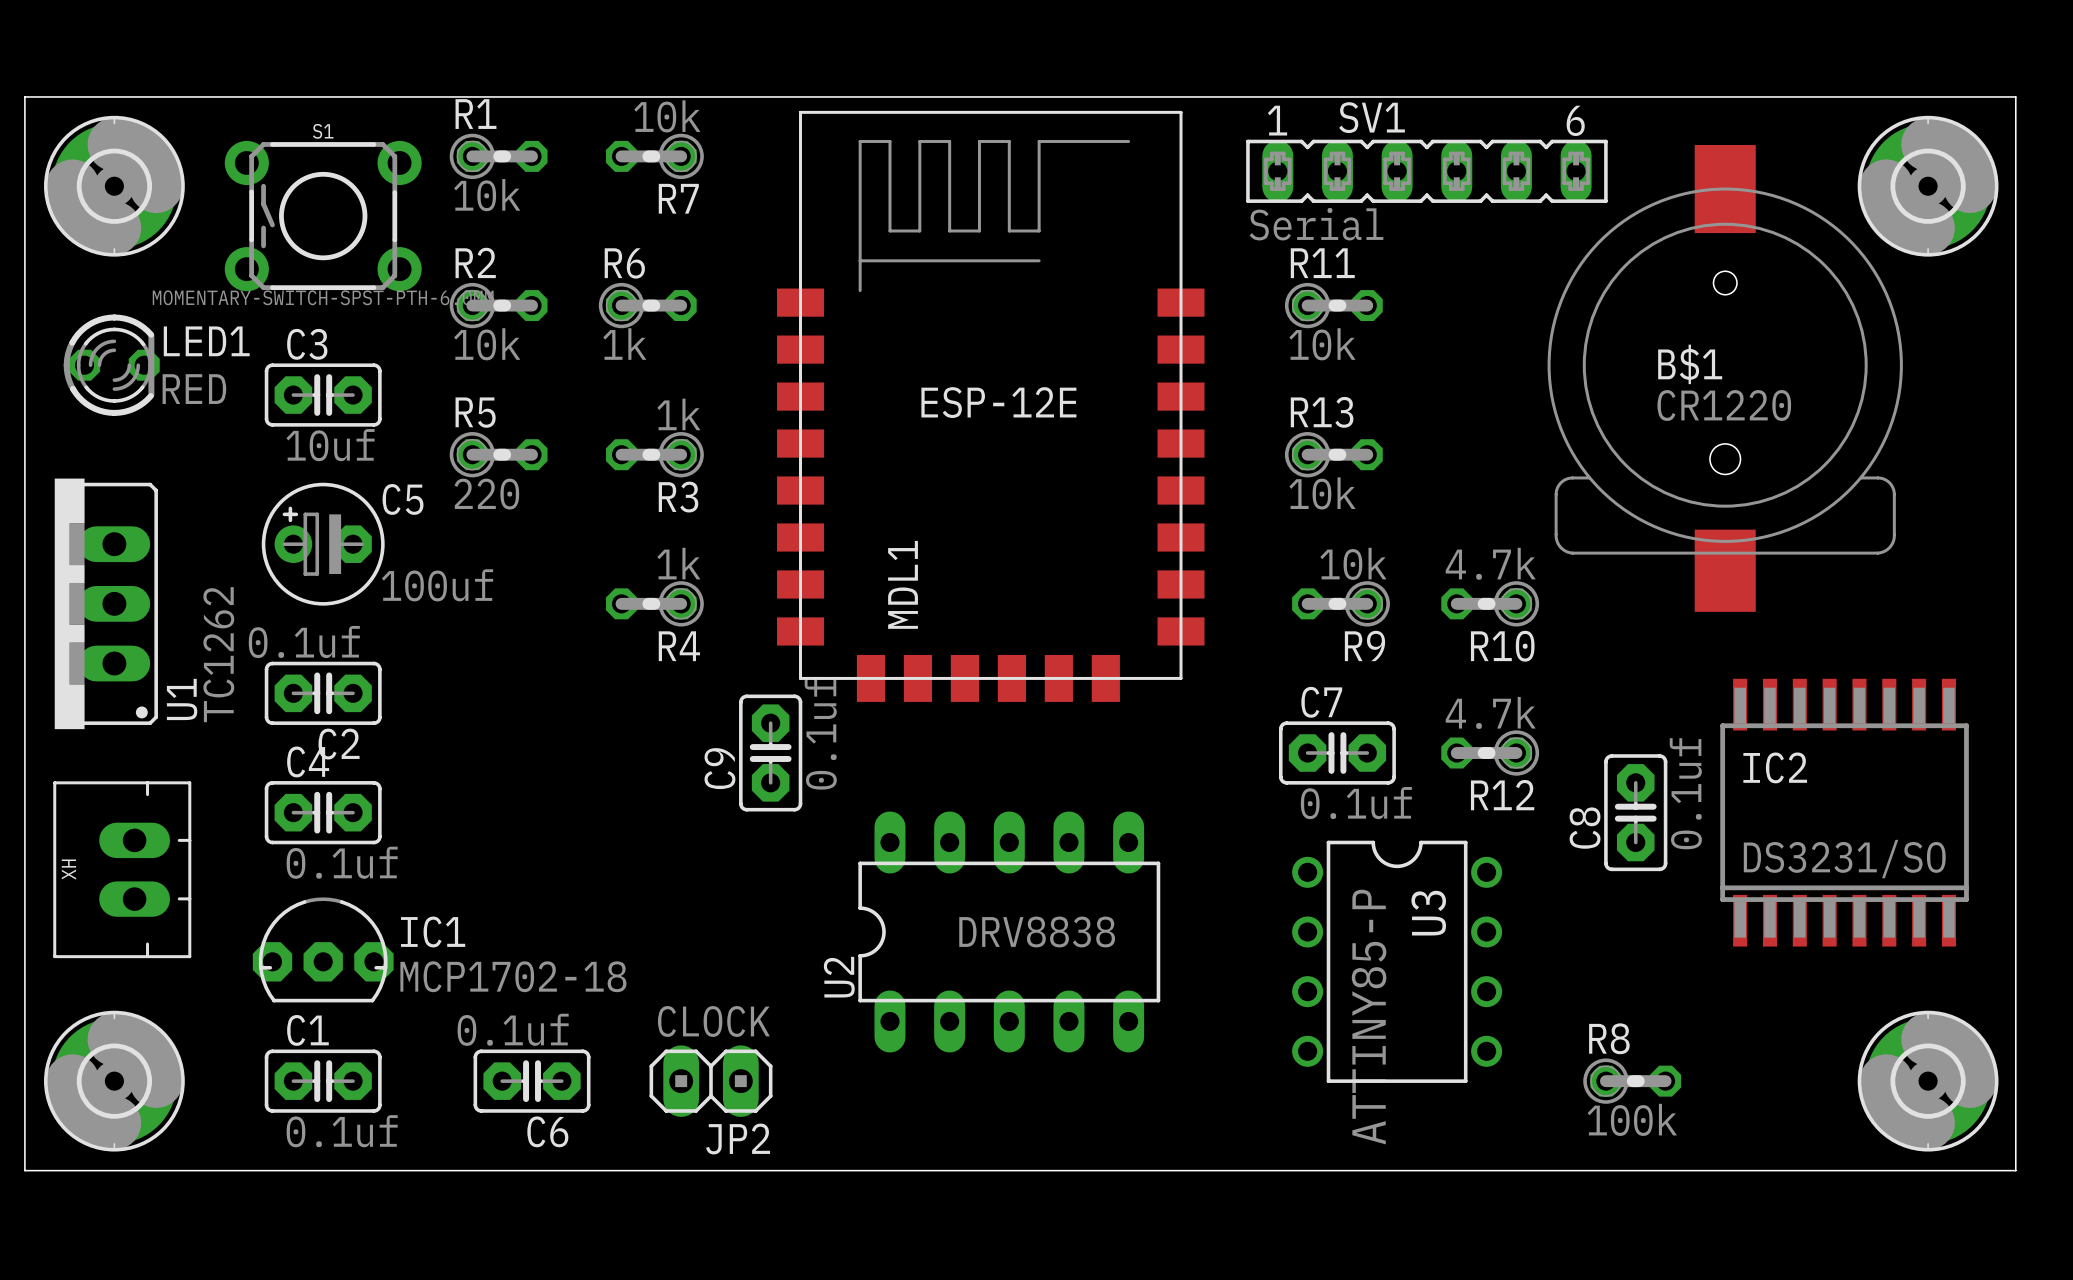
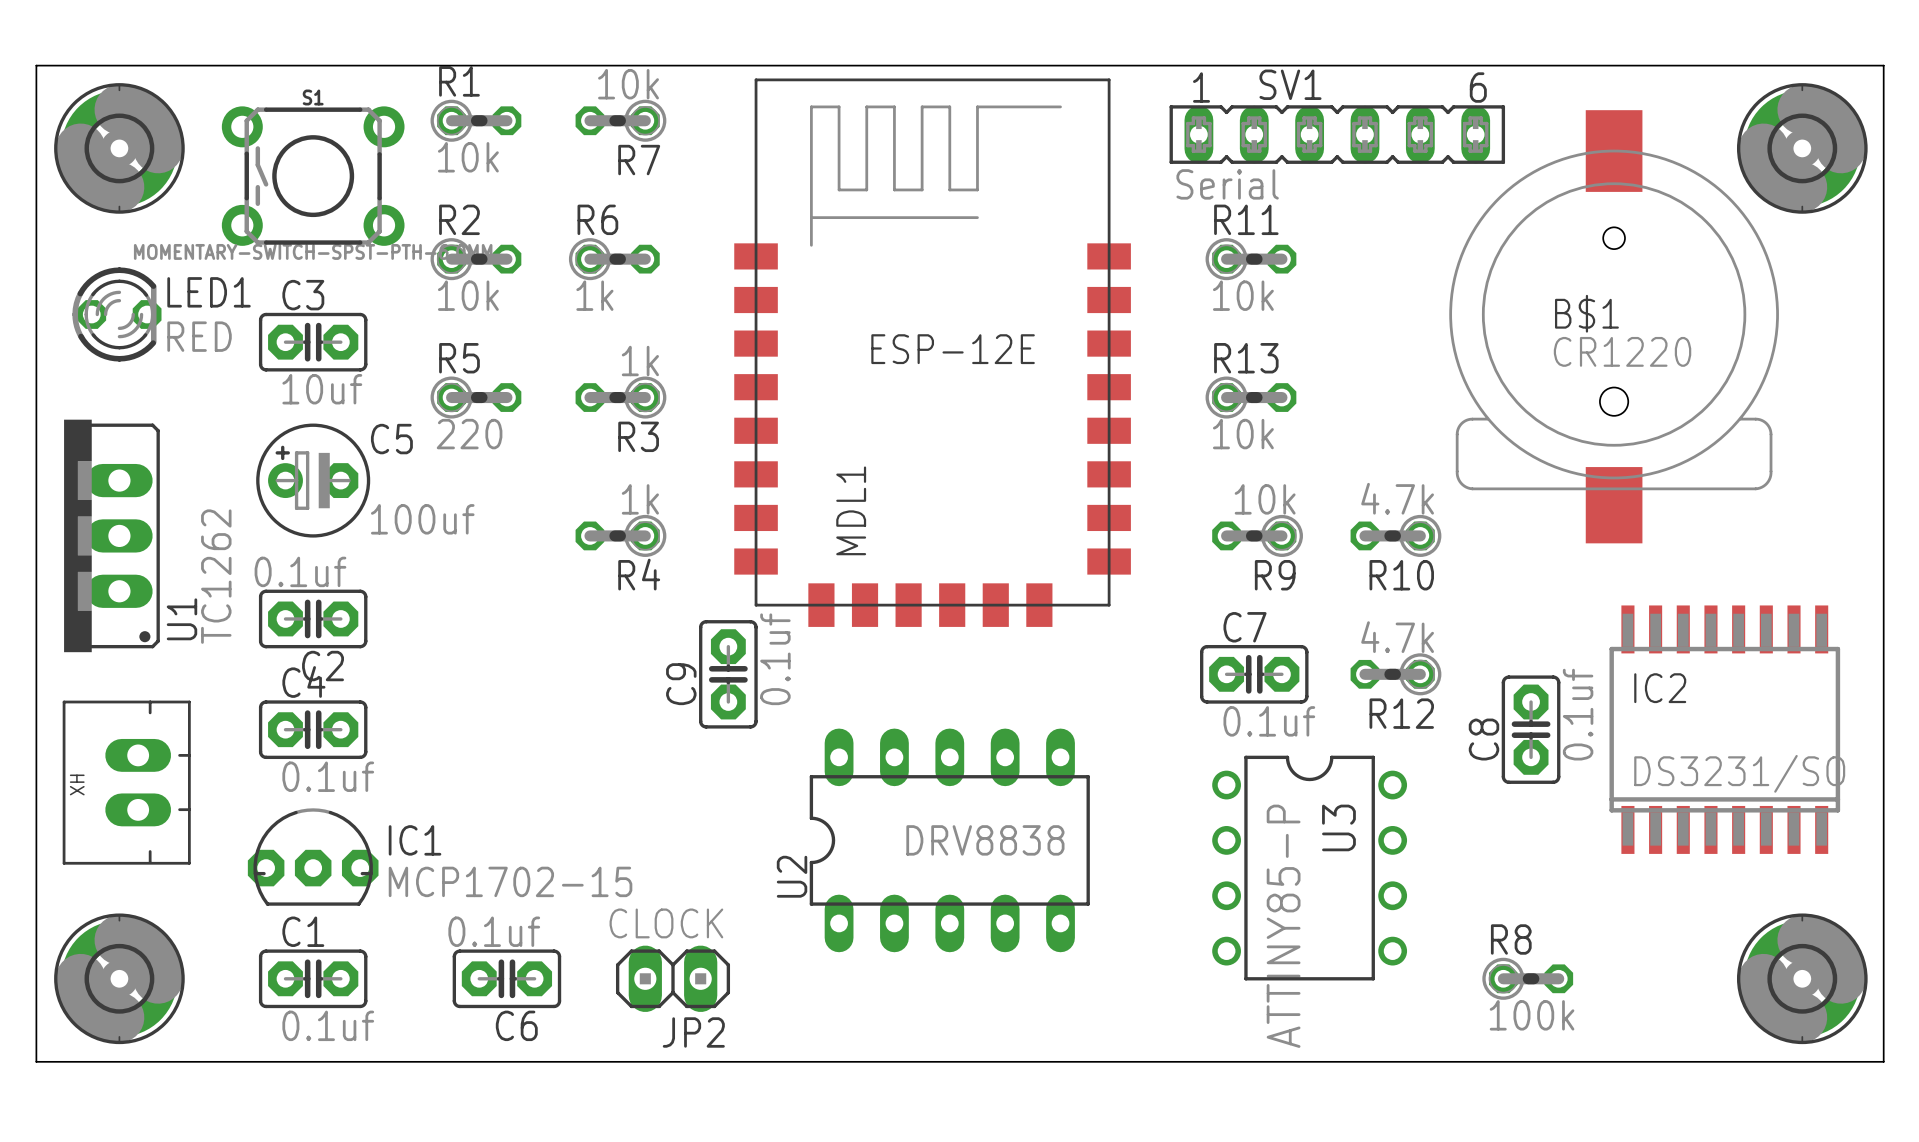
IC1 value: MCP1702-18 (513, 976) -> MCP1702-15 (510, 881)

